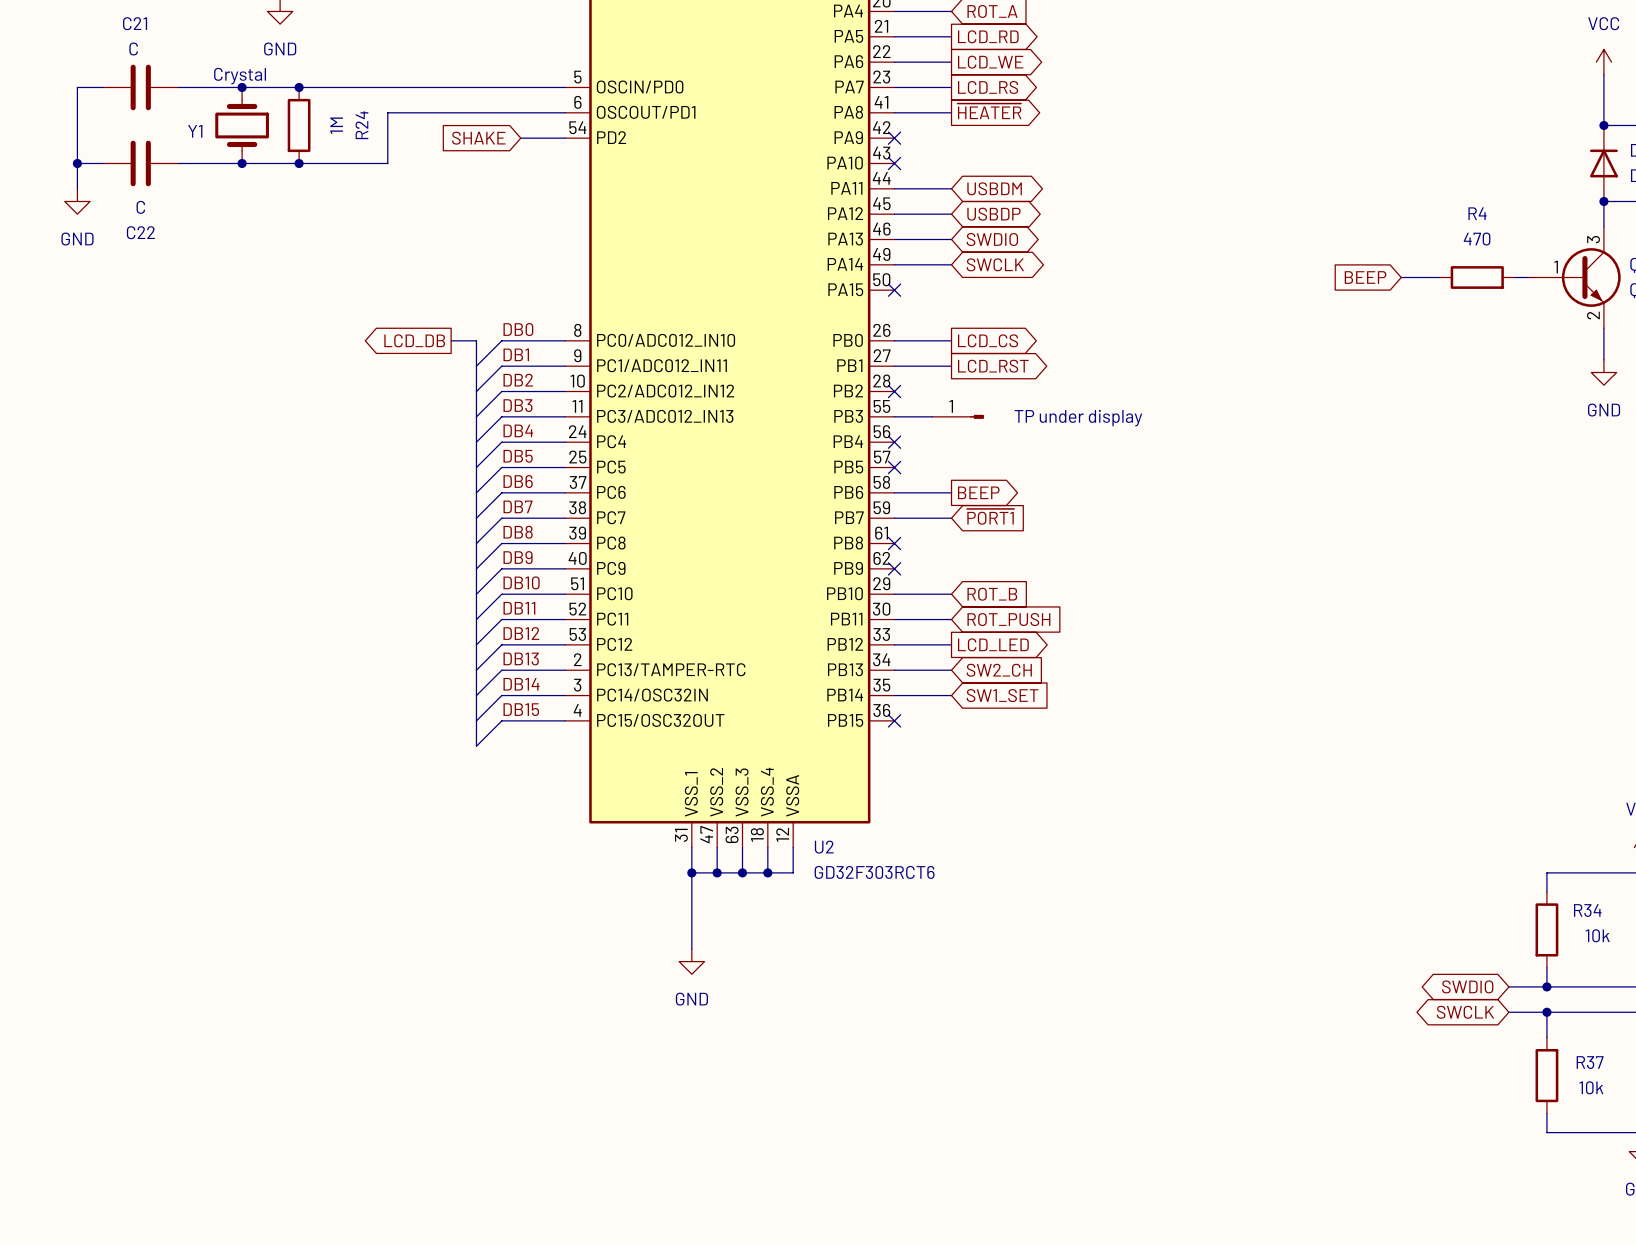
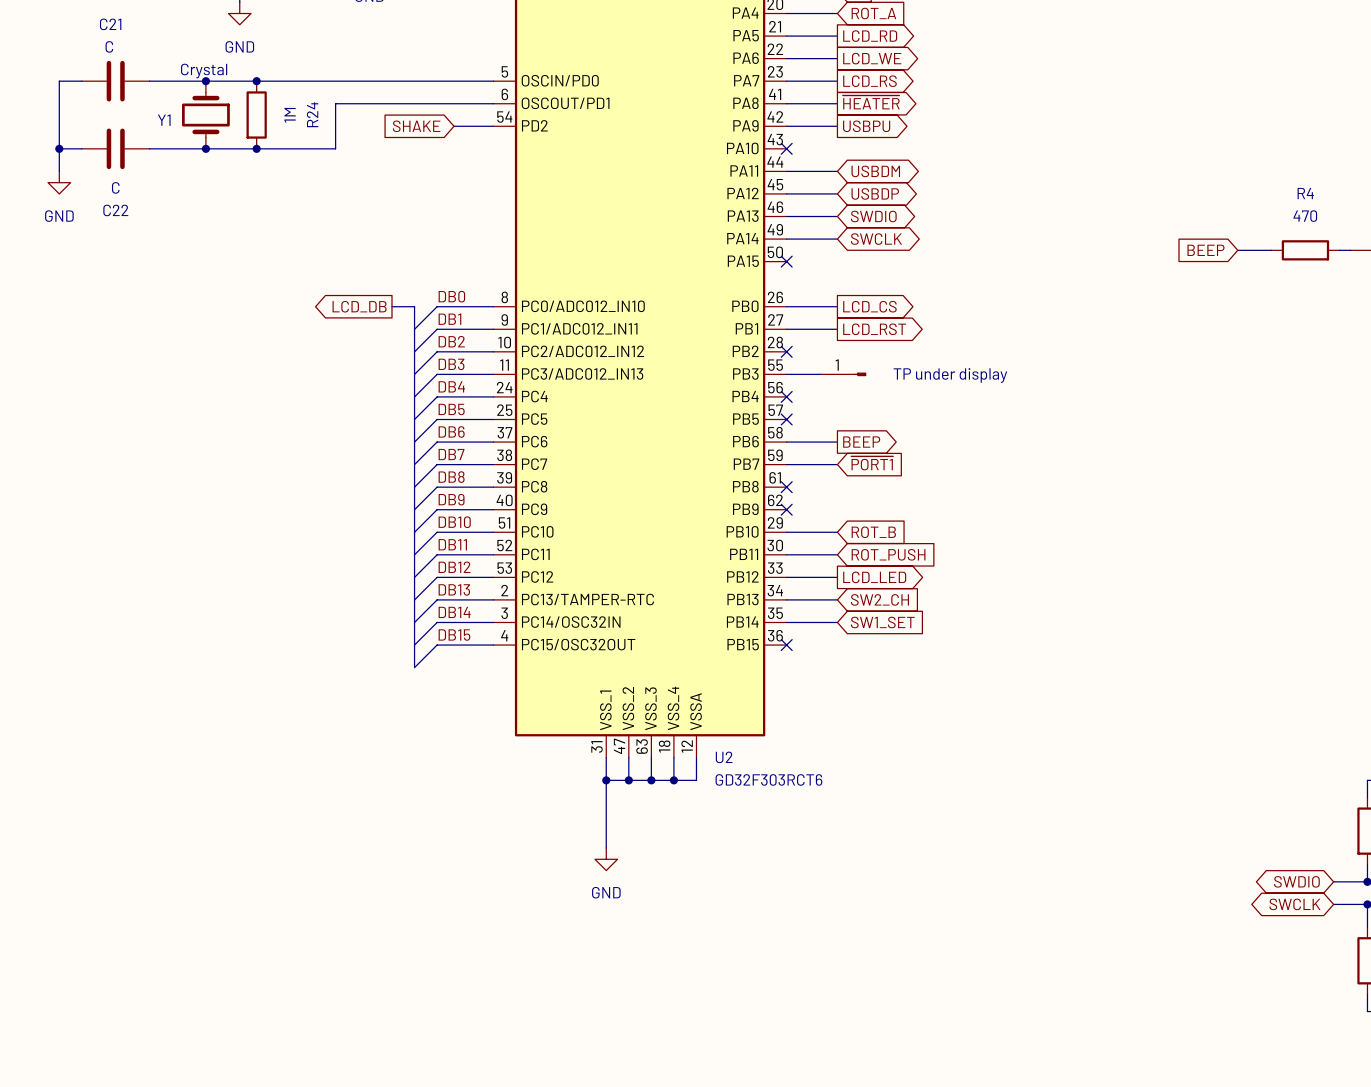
wire: none -> (786, 126) (837, 126)
no-connect mark: (894, 138) -> none
global label: none -> USBPU (866, 126)

